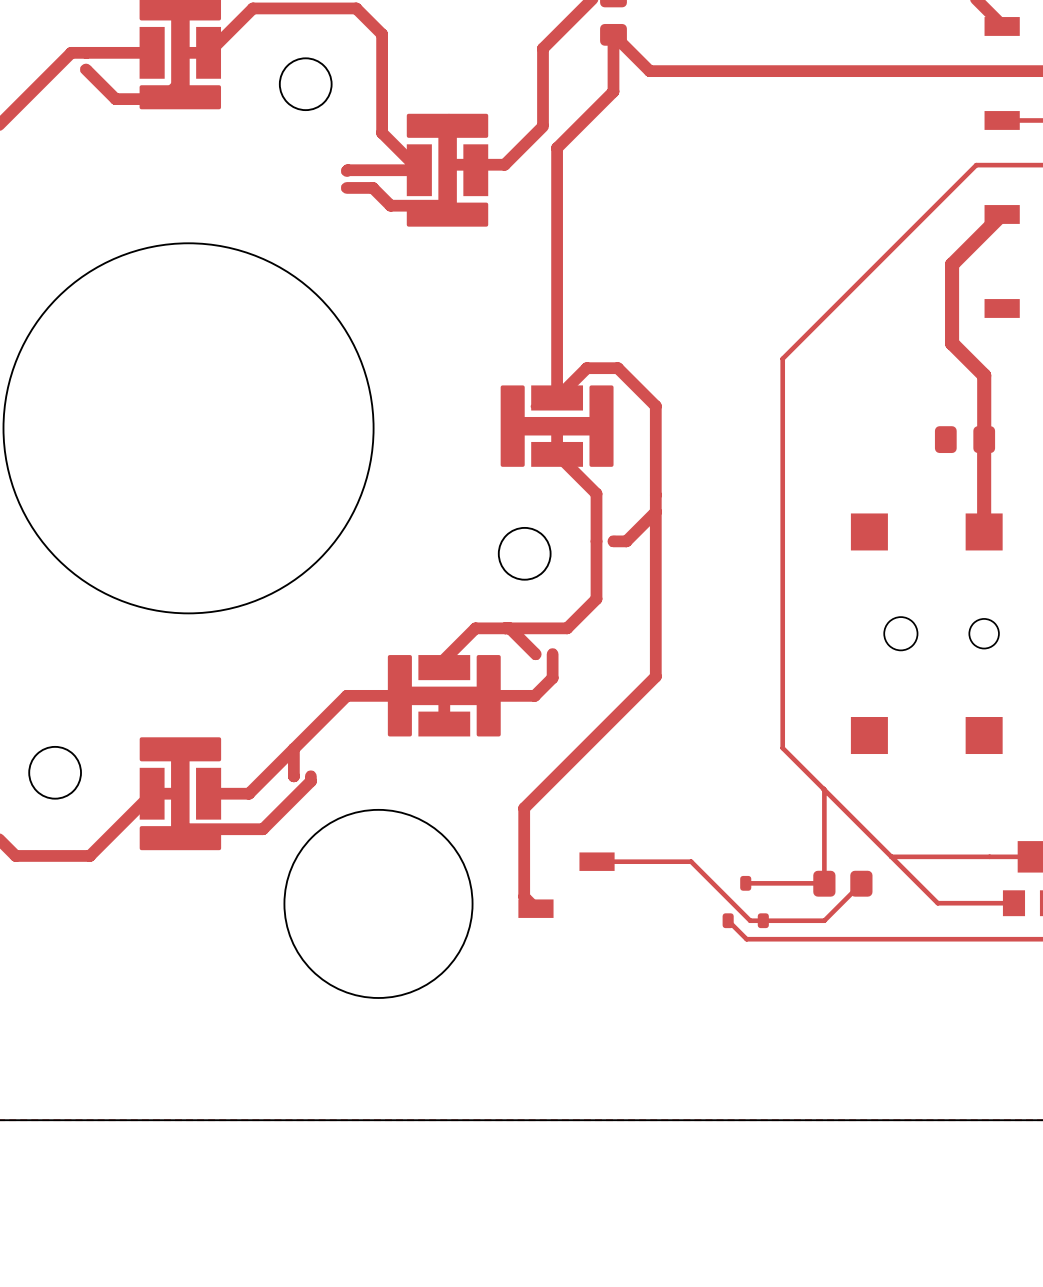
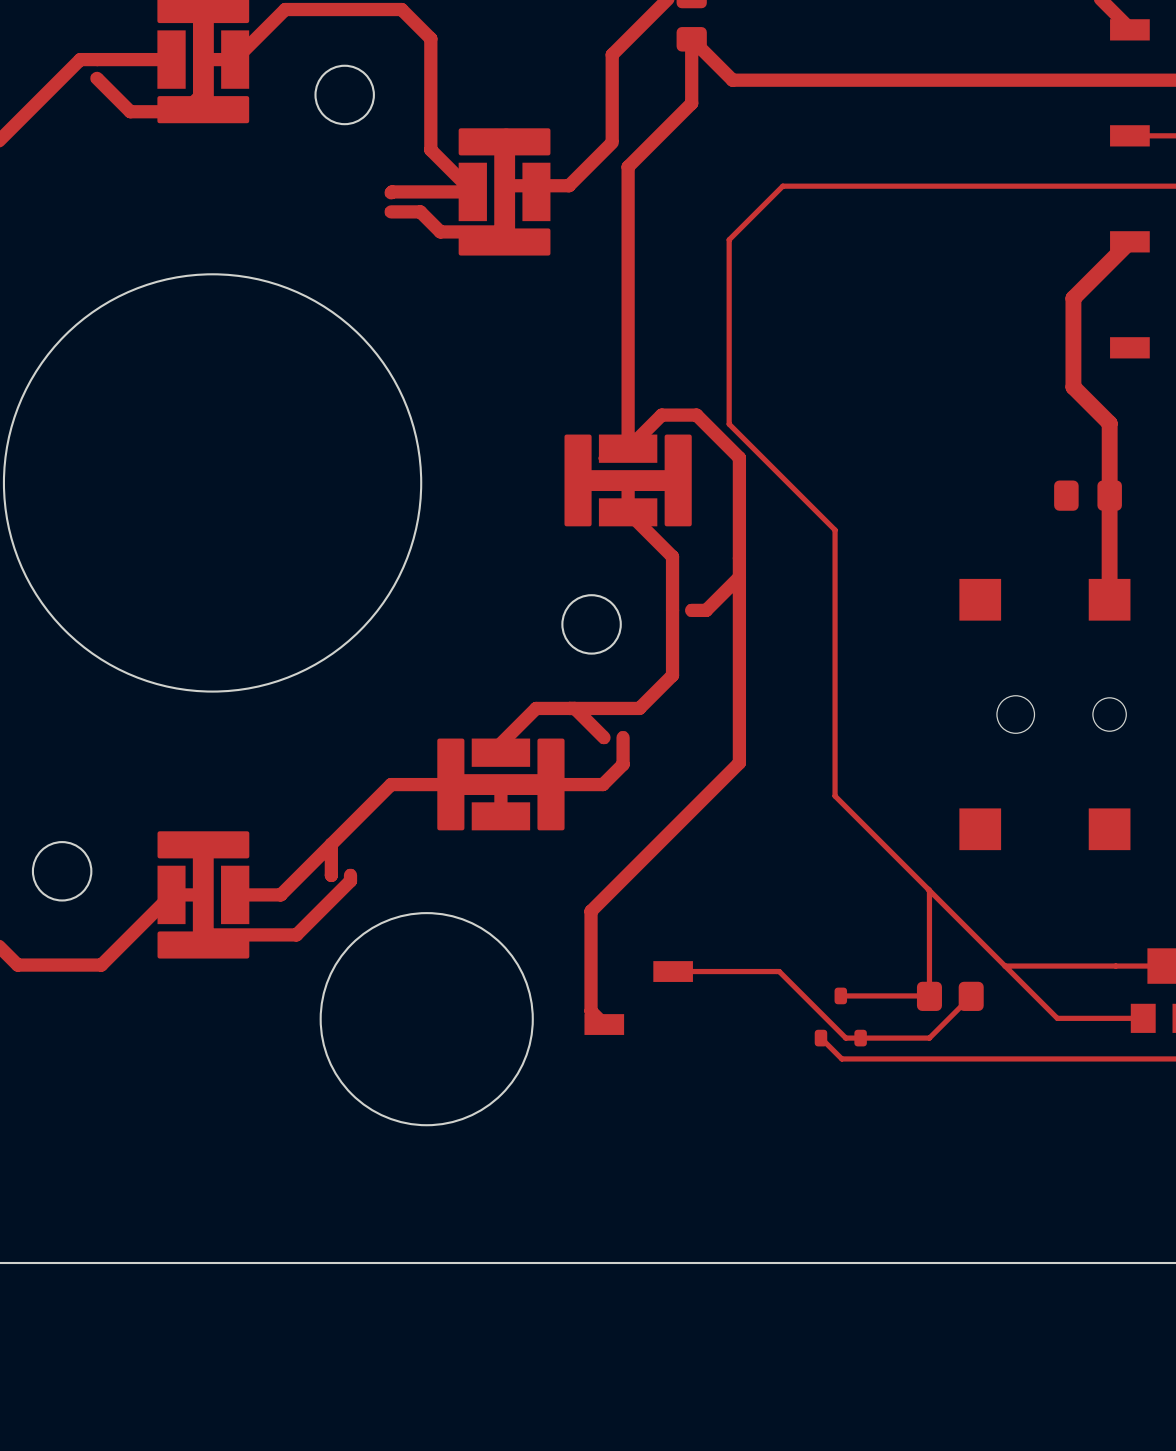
top track: (976, 165) (782, 358) (782, 748) -> (1100, 186) (782, 186) (729, 239) (729, 424) (835, 530) (835, 796) (882, 843)

